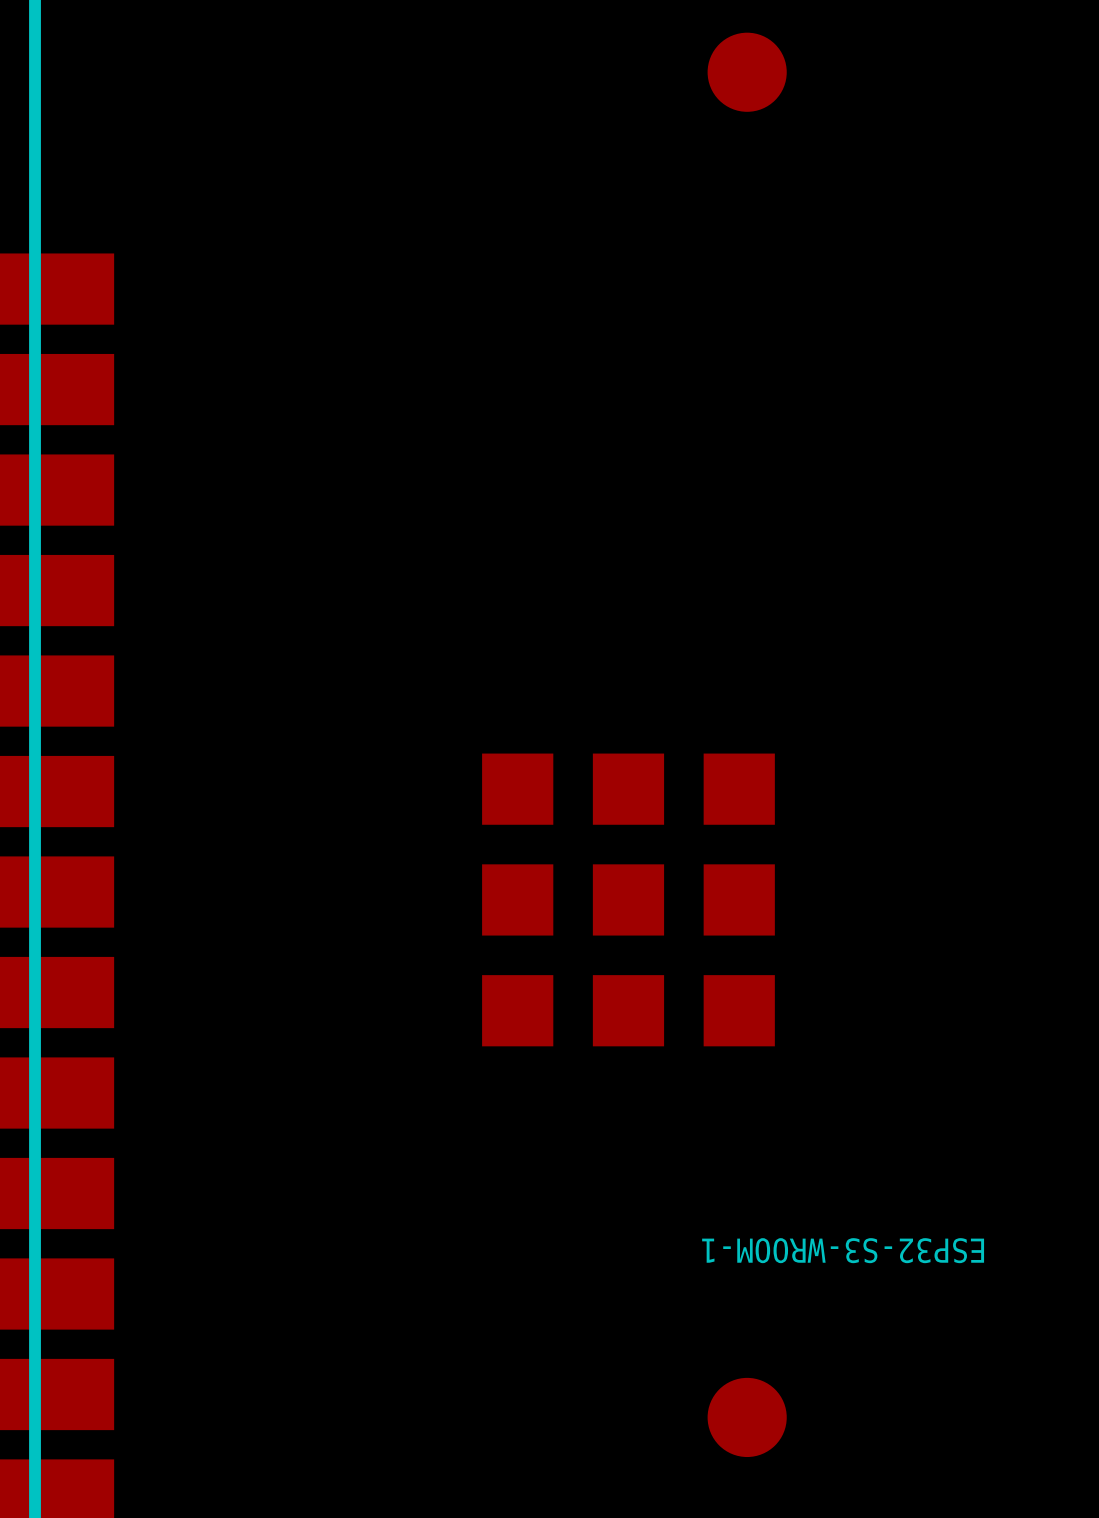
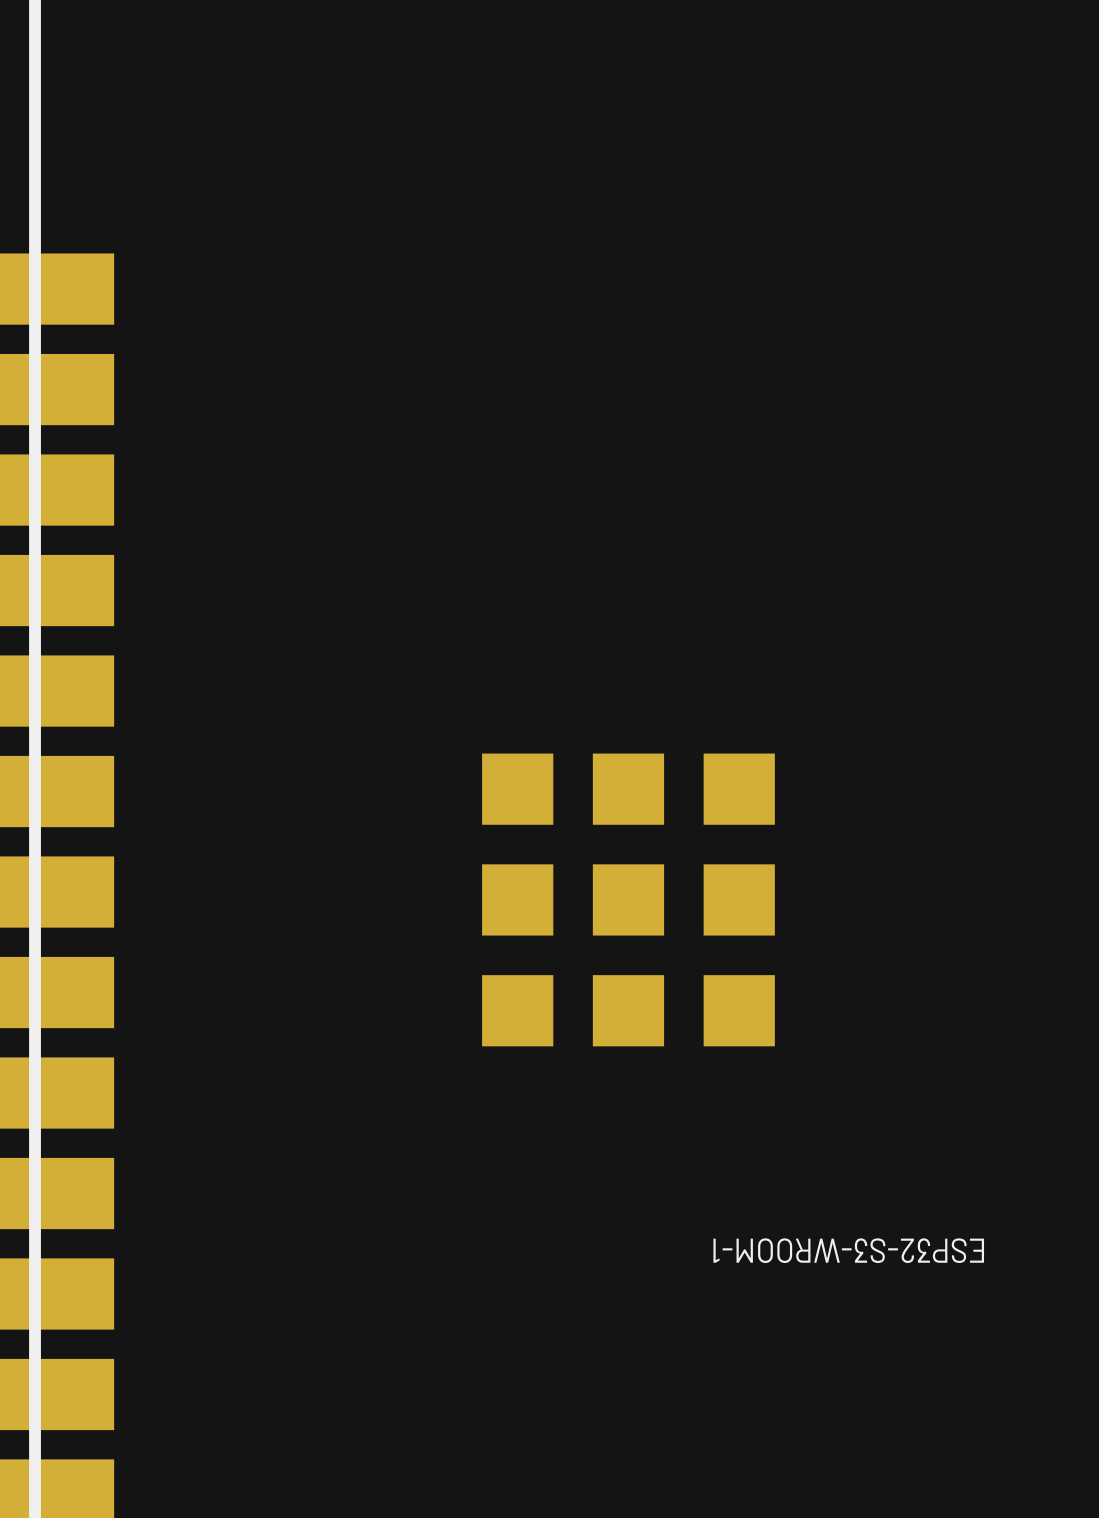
part: (747, 72) -> none
part: (747, 1417) -> none

